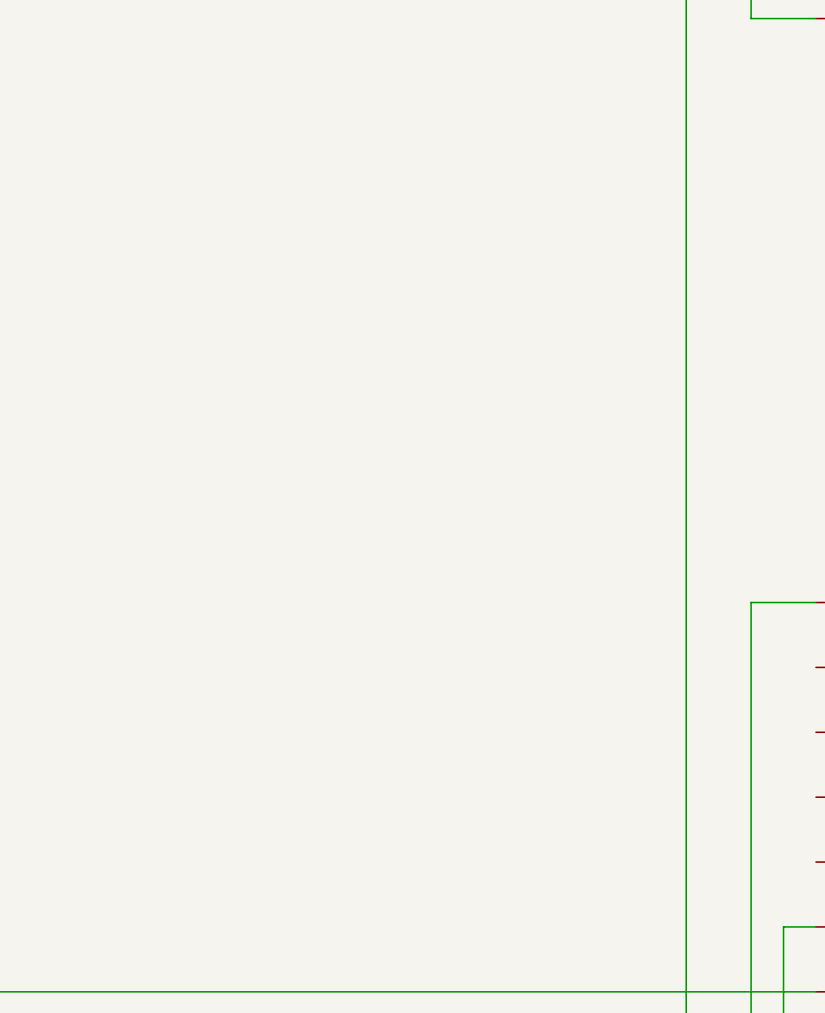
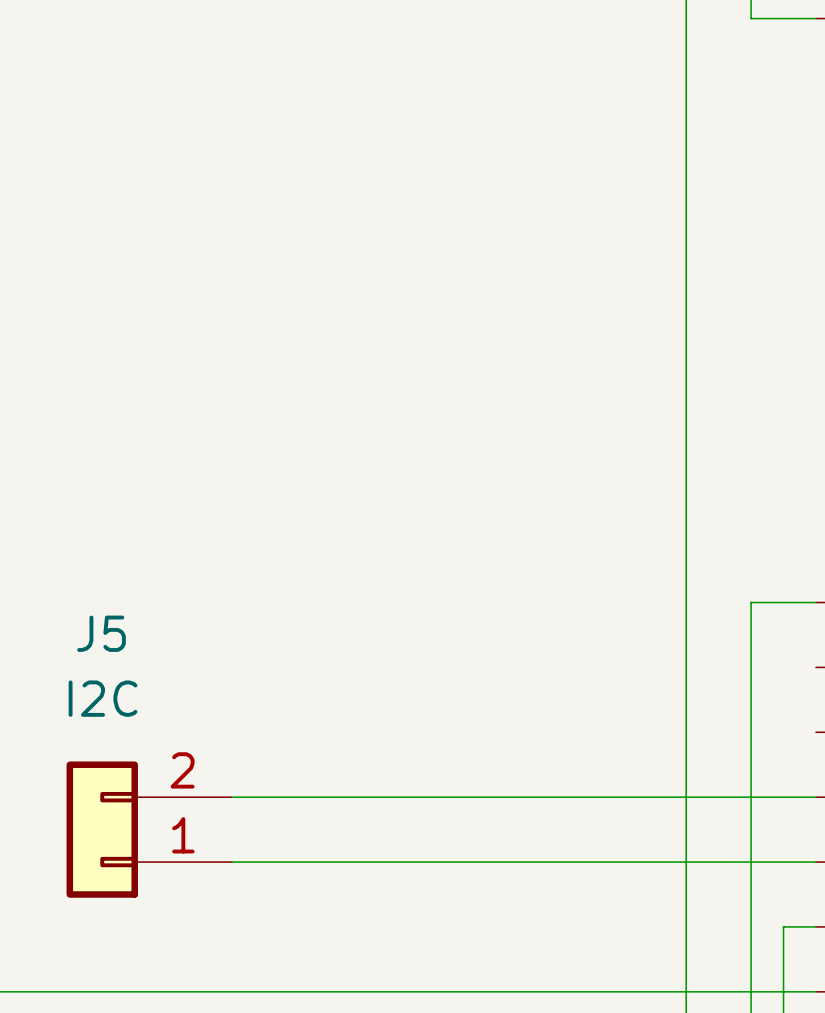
wire: none -> (232, 797) (815, 797)
J5: none -> I2C (149, 829)
wire: none -> (232, 862) (815, 862)

